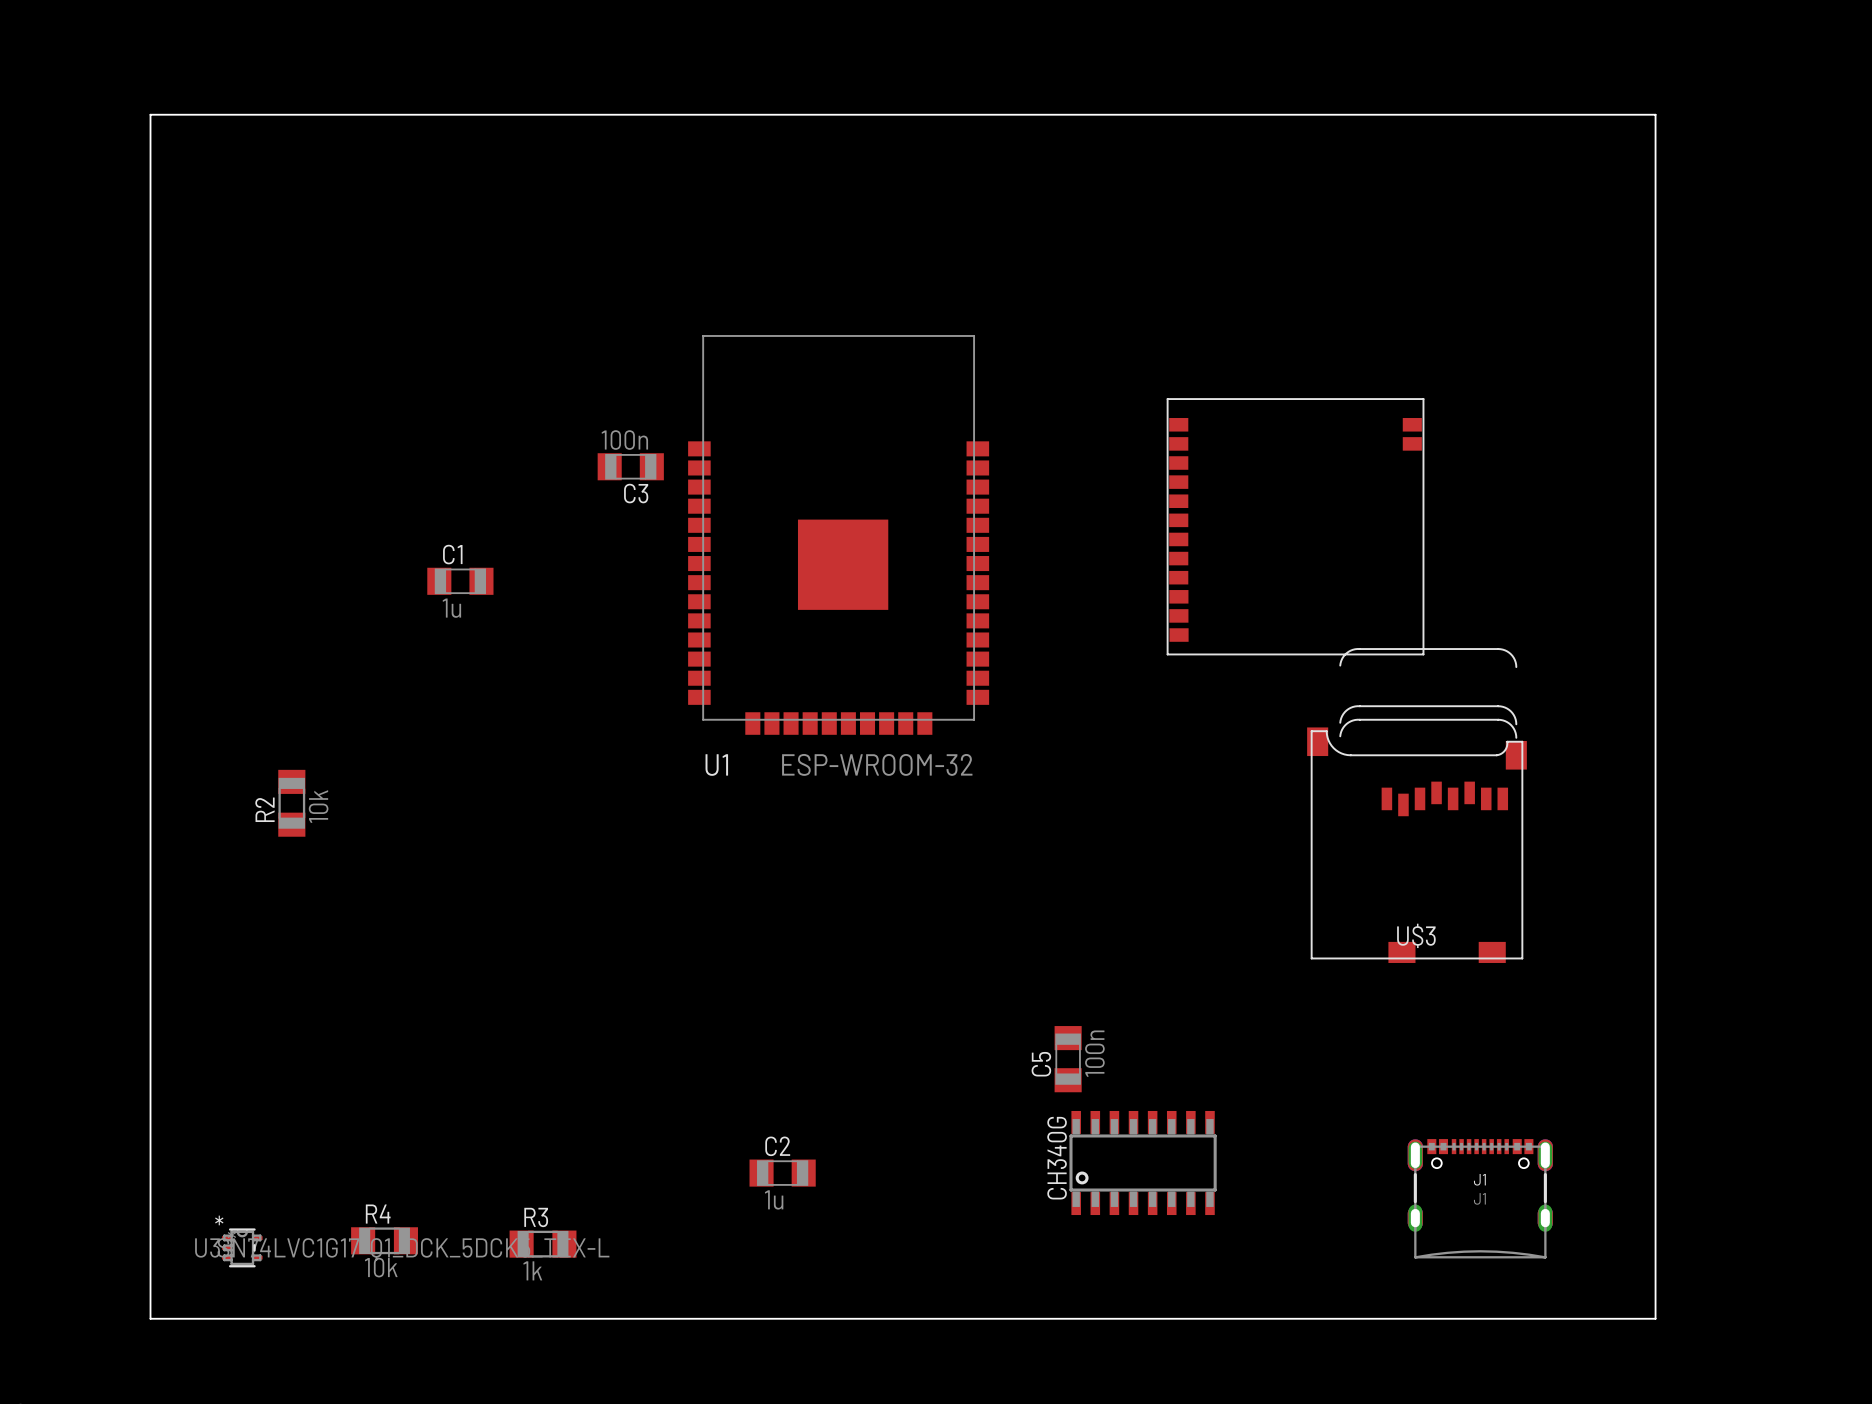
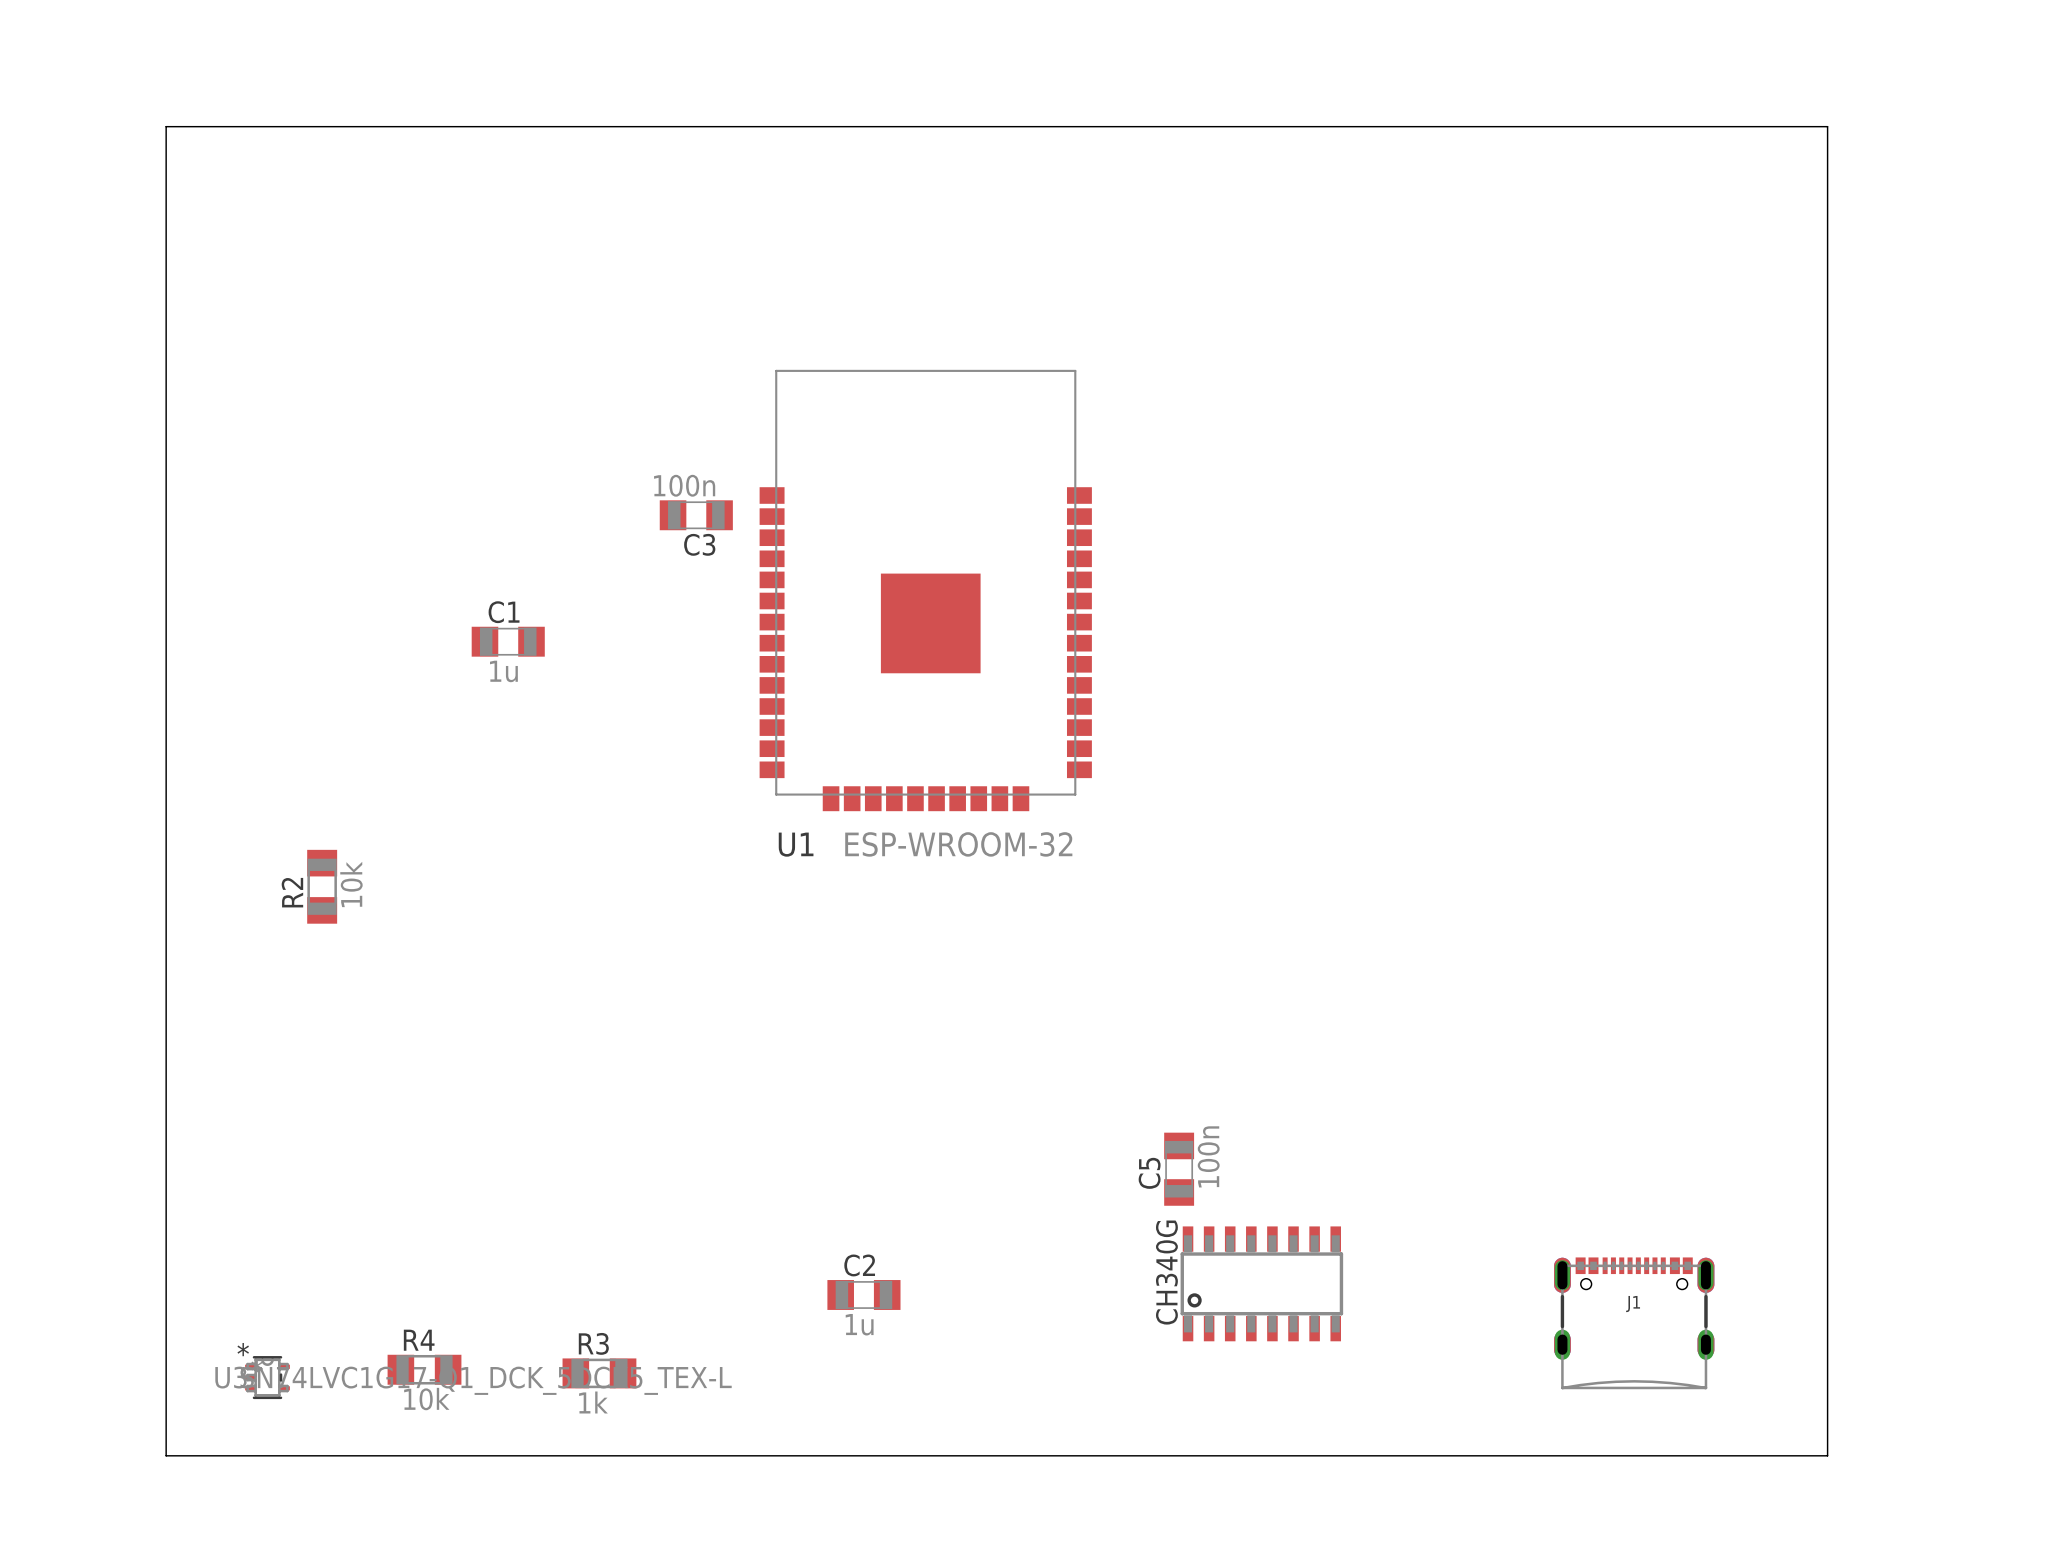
part: (1295, 526) -> none
U$3: (1417, 805) -> none
J1 value: J1 (1479, 1198) -> none

